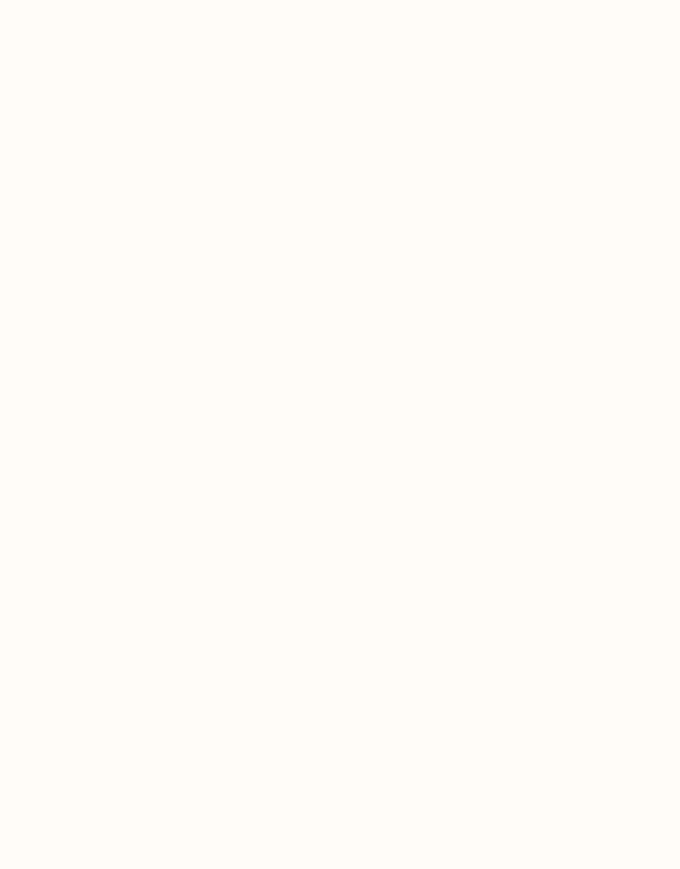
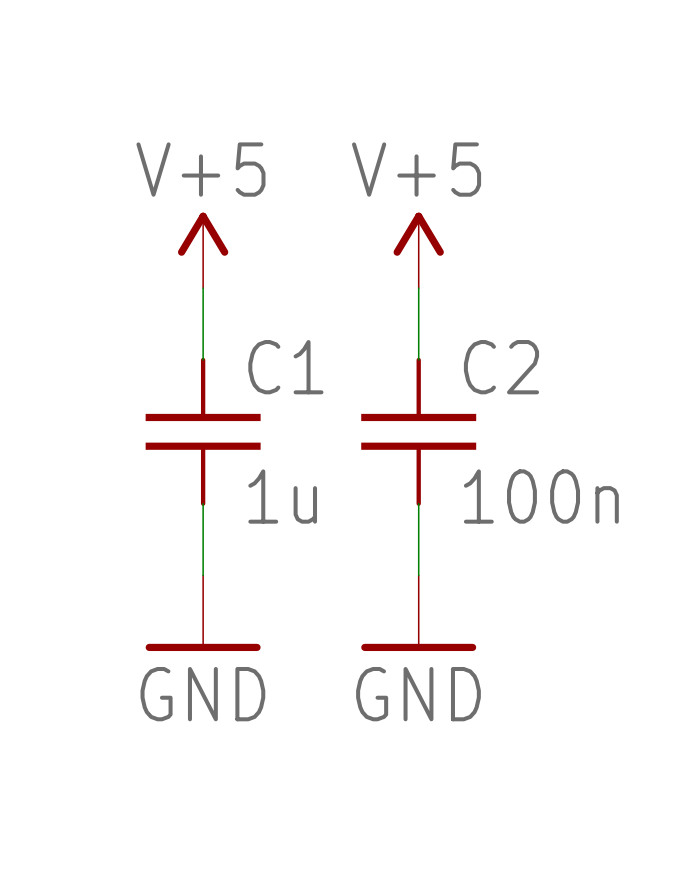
power symbol: none -> V+5 (203, 250)
power symbol: none -> V+5 (418, 250)
wire: none -> (203, 288) (203, 359)
wire: none -> (418, 288) (418, 359)
C1: none -> 1u (203, 431)
C2: none -> 100n (418, 431)
wire: none -> (203, 503) (203, 575)
wire: none -> (418, 503) (418, 575)
power symbol: none -> GND (203, 613)
power symbol: none -> GND (418, 613)

